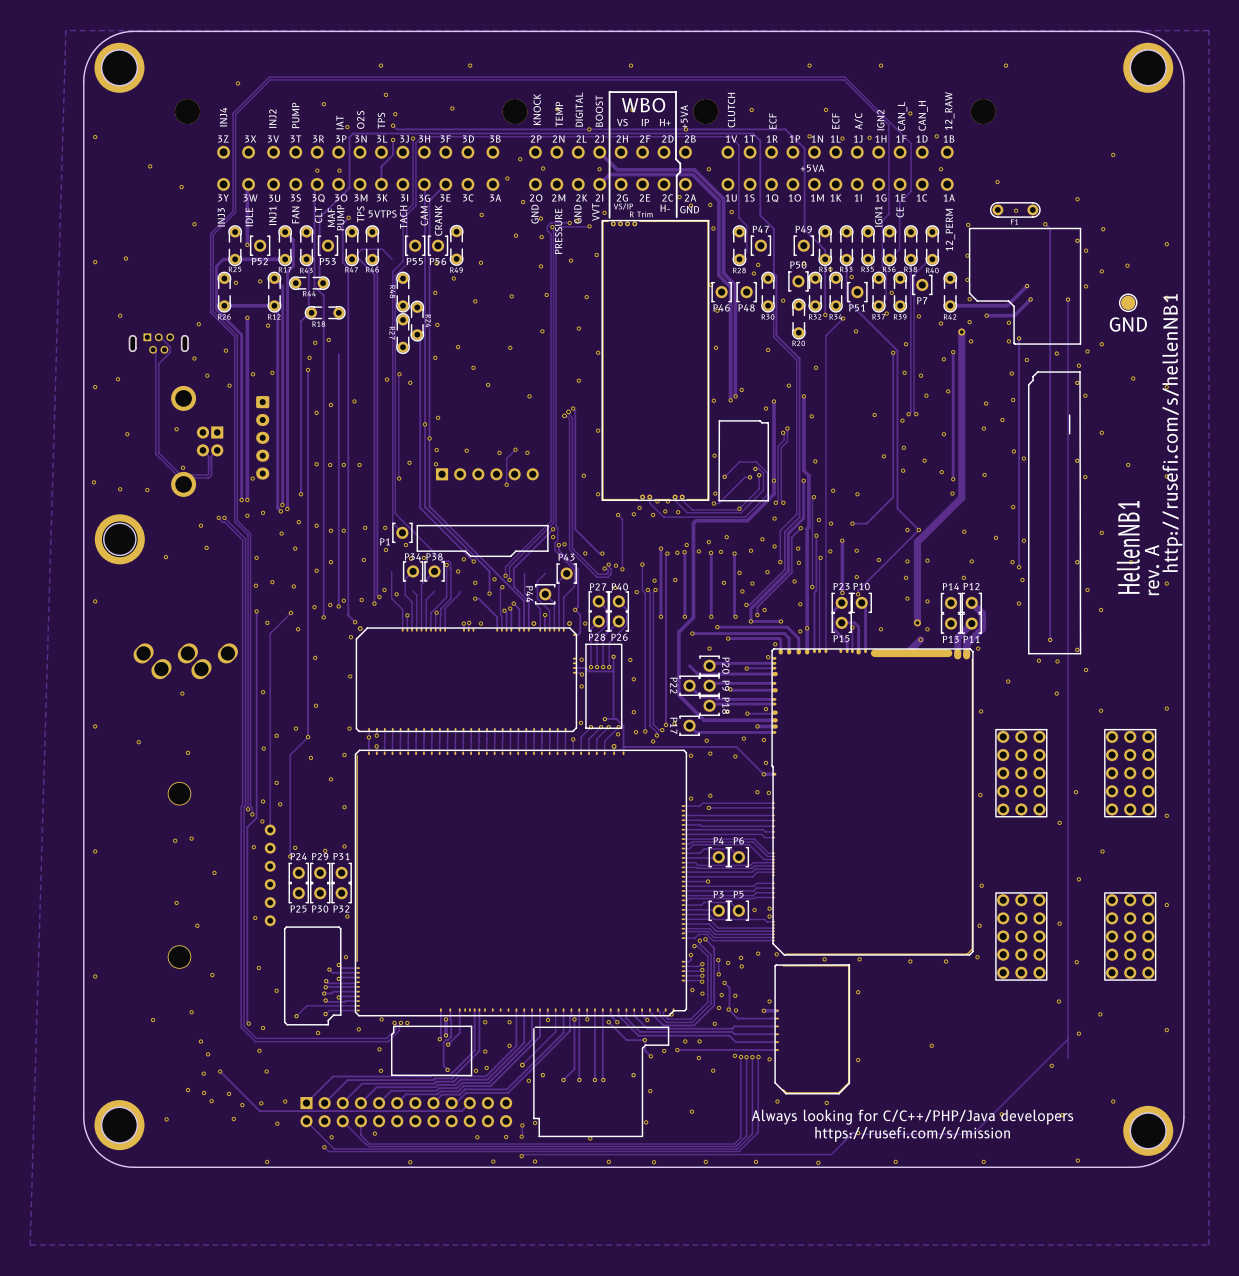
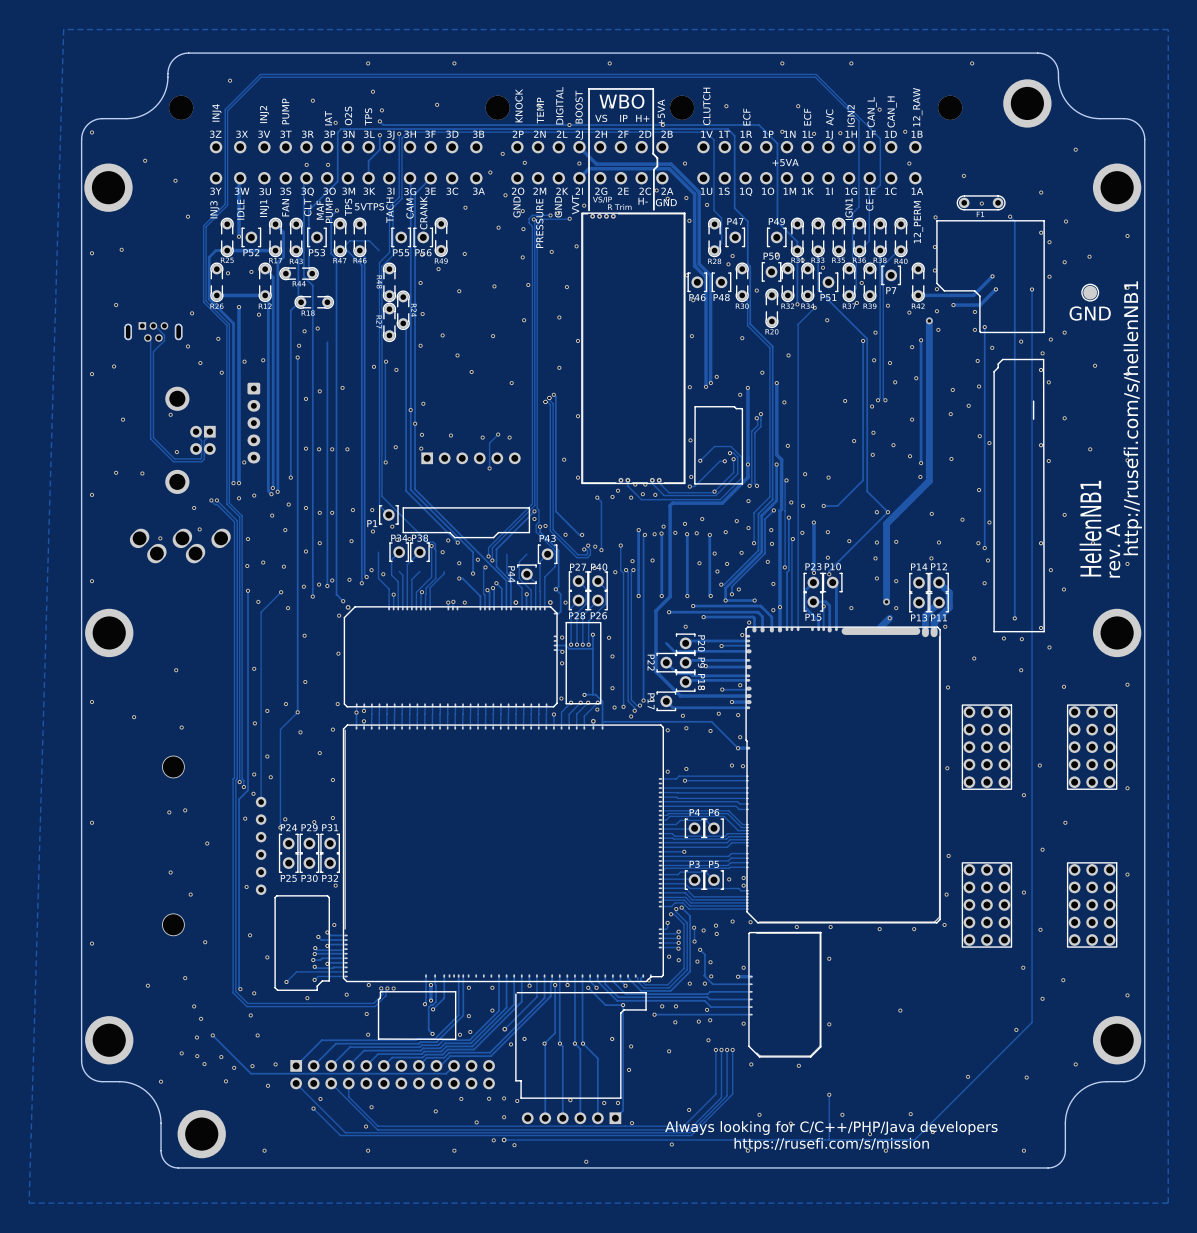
board edge: (1133, 31) (133, 31) (114, 35) (98, 46) (87, 62) (83, 81) (83, 1117) (87, 1136) (98, 1152) (114, 1163) (133, 1167) (1133, 1167) (1153, 1163) (1169, 1152) (1180, 1136) (1183, 1117) (1183, 81) (1180, 62) (1169, 46) (1153, 35) (1133, 31) -> (1037, 53) (1048, 55) (1055, 63) (1061, 93) (1073, 109) (1091, 117) (1131, 120) (1140, 126) (1144, 136) (1144, 1060) (1140, 1073) (1129, 1080) (1094, 1083) (1077, 1093) (1070, 1103) (1066, 1115) (1064, 1157) (1058, 1164) (1050, 1167) (178, 1167) (167, 1164) (161, 1152) (160, 1115) (151, 1096) (142, 1088) (131, 1083) (94, 1080) (85, 1073) (81, 1063) (81, 139) (85, 126) (96, 119) (130, 118) (149, 111) (158, 103) (164, 93) (170, 63) (176, 57) (185, 53) (1037, 53)
round board edge: [100, 49, 139, 87] -> none
round board edge: [1129, 49, 1167, 87] -> none
part: (119, 67) -> none
part: (1148, 67) -> none
part: none -> (1027, 103)
part: none -> (108, 187)
part: none -> (1117, 187)
part position: (197, 441) -> (190, 440)
via position: (93, 482) -> (91, 494)
round board edge: [103, 522, 137, 557] -> none
part: (119, 539) -> none
part: none -> (109, 632)
part: none -> (1117, 632)
part position: (185, 661) -> (180, 545)
via: (719, 1007) -> none
via: (728, 1009) -> none
via: none -> (689, 983)
via: none -> (704, 983)
via: (714, 1023) -> none
track: (1068, 1039) (973, 1134) (858, 1134) -> none
via: none -> (707, 1009)
track: (644, 1050) (650, 1056) -> (623, 1014) (623, 1110) (615, 1118)
via: (664, 1050) -> none
via: (650, 1056) -> none
via: none -> (698, 1021)
track: (741, 1057) (740, 1086) -> none
via: (741, 1057) -> none
track: (746, 1057) (746, 1086) -> none
via: (746, 1057) -> none
track: (752, 1057) (752, 1086) -> none
via: (752, 1057) -> none
track: (758, 1057) (758, 1086) -> none
via: (758, 1057) -> none
track: none -> (1032, 1022) (914, 1139) (504, 1139)
via: (713, 1070) -> none
part: none -> (109, 1040)
via: none -> (708, 1040)
part: none -> (1117, 1040)
track: none -> (559, 1043) (562, 1046) (562, 1118)
track: none -> (574, 1043) (580, 1049) (580, 1118)
track: none -> (583, 1043) (597, 1058) (597, 1118)
track: none -> (545, 1044) (545, 1118)
via: none -> (631, 1046)
via: none -> (715, 1049)
via: none -> (721, 1049)
via: none -> (727, 1049)
via: none -> (732, 1049)
via: none -> (669, 1051)
via: (650, 1091) -> none
round board edge: [100, 1106, 139, 1144] -> none
via: none -> (629, 1069)
via: (691, 1111) -> none
round board edge: [1129, 1112, 1167, 1150] -> none
text position: Always looking for C/C++/PHP/Java developers (912, 1117) -> Always looking for C/C++/PHP/Java developers (831, 1128)
via: (535, 1122) -> none
via: (646, 1122) -> none
part: (119, 1125) -> none
track: (522, 1125) (521, 1136) -> none
via: (522, 1125) -> none
part: (1148, 1130) -> none
track: (740, 1132) (740, 1137) (734, 1144) (369, 1144) -> (715, 1094) (683, 1126) (378, 1126) (357, 1105)
track: (858, 1132) (852, 1132) (831, 1154) (523, 1154) (521, 1156) -> (829, 1094) (829, 1139)
via: (374, 1133) -> none
text position: https://rusefi.com/s/mission (912, 1134) -> https://rusefi.com/s/mission (831, 1144)
via: none -> (517, 1101)
via: none -> (604, 1103)
via: none -> (618, 1103)
track: (365, 1143) (368, 1146) (735, 1146) -> (352, 1105) (377, 1130) (689, 1130) (711, 1107)
via: none -> (371, 1107)
via: none -> (689, 1109)
track: (737, 1149) (334, 1149) -> (712, 1110) (690, 1132) (345, 1132) (323, 1110)
via: none -> (435, 1111)
track: (739, 1151) (328, 1151) -> (714, 1112) (691, 1135) (340, 1135) (317, 1112)
via: none -> (910, 1114)
via: none -> (759, 1114)
via: none -> (842, 1114)
part: none -> (571, 1118)
via position: (1077, 1160) -> (1023, 1150)
via position: (267, 1161) -> (264, 1150)
via: (535, 1161) -> none
via: (608, 1161) -> none
via: (705, 1161) -> none
via: (756, 1161) -> none
via: (895, 1161) -> none
via position: (983, 1161) -> (932, 1132)
via: (410, 1162) -> none
via: none -> (366, 1126)
part: none -> (201, 1134)
via: none -> (869, 1134)
via: none -> (504, 1139)
via: none -> (493, 1140)
via: none -> (671, 1144)
via: none -> (514, 1145)
via: none -> (368, 1150)
via: none -> (454, 1150)
via: none -> (747, 1150)
via: none -> (885, 1150)
via: none -> (586, 1161)

